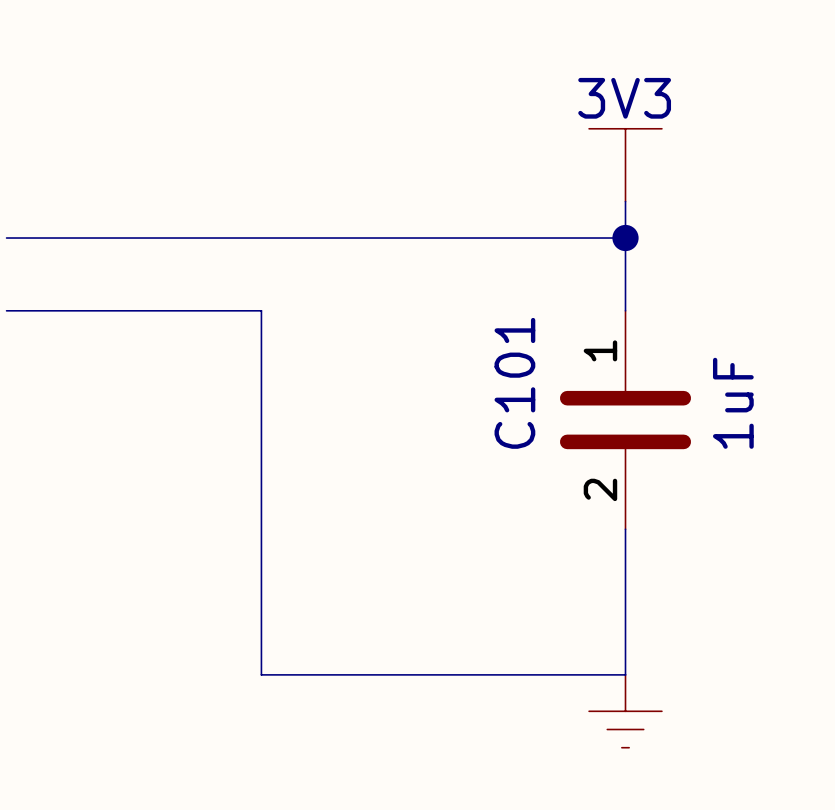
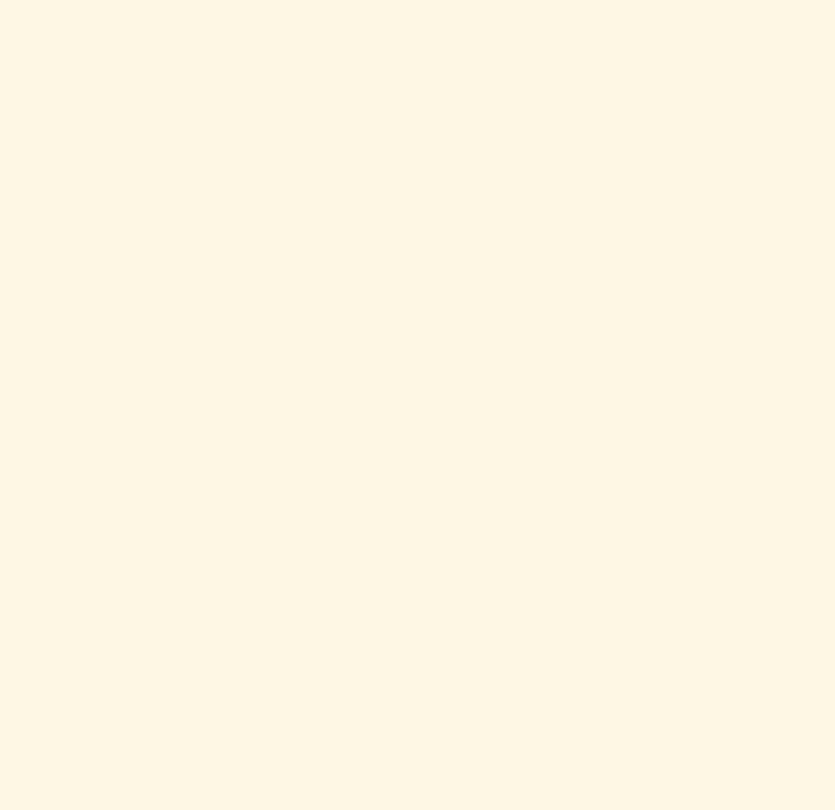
power symbol: 3V3 (625, 165) -> none
wire: (625, 201) (625, 310) -> none
wire: (6, 238) (625, 238) -> none
junction: (625, 238) -> none
wire: (6, 310) (261, 310) (261, 674) (625, 674) (625, 529) -> none
C101: 1uF (625, 420) -> none
power symbol: (625, 711) -> none

